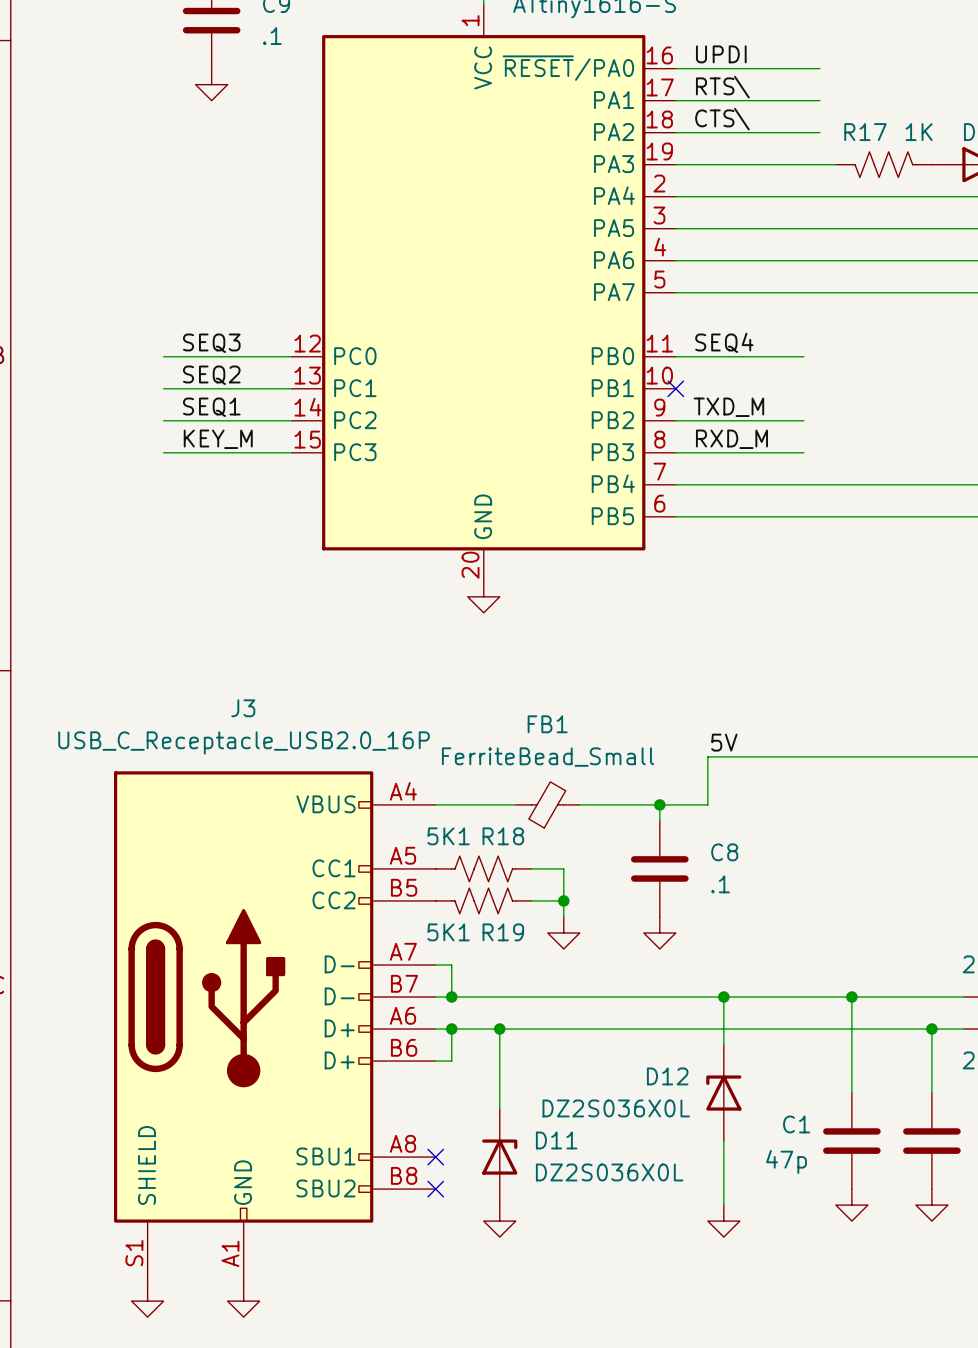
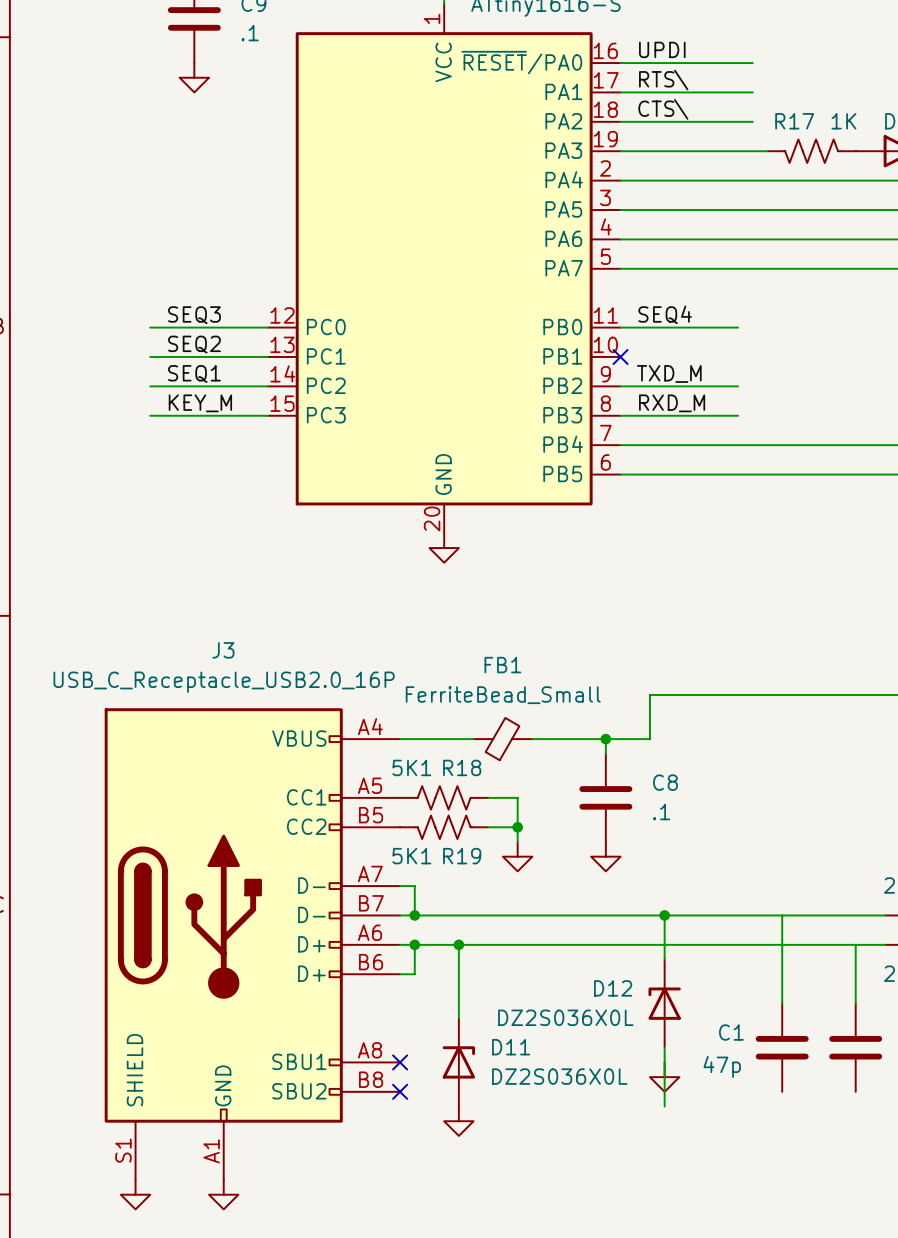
label: 5V (724, 742) -> none
junction: (851, 997) -> none
junction: (931, 1029) -> none
power symbol: (851, 1205) -> none
power symbol: (931, 1205) -> none
power symbol position: (723, 1221) -> (664, 1077)

